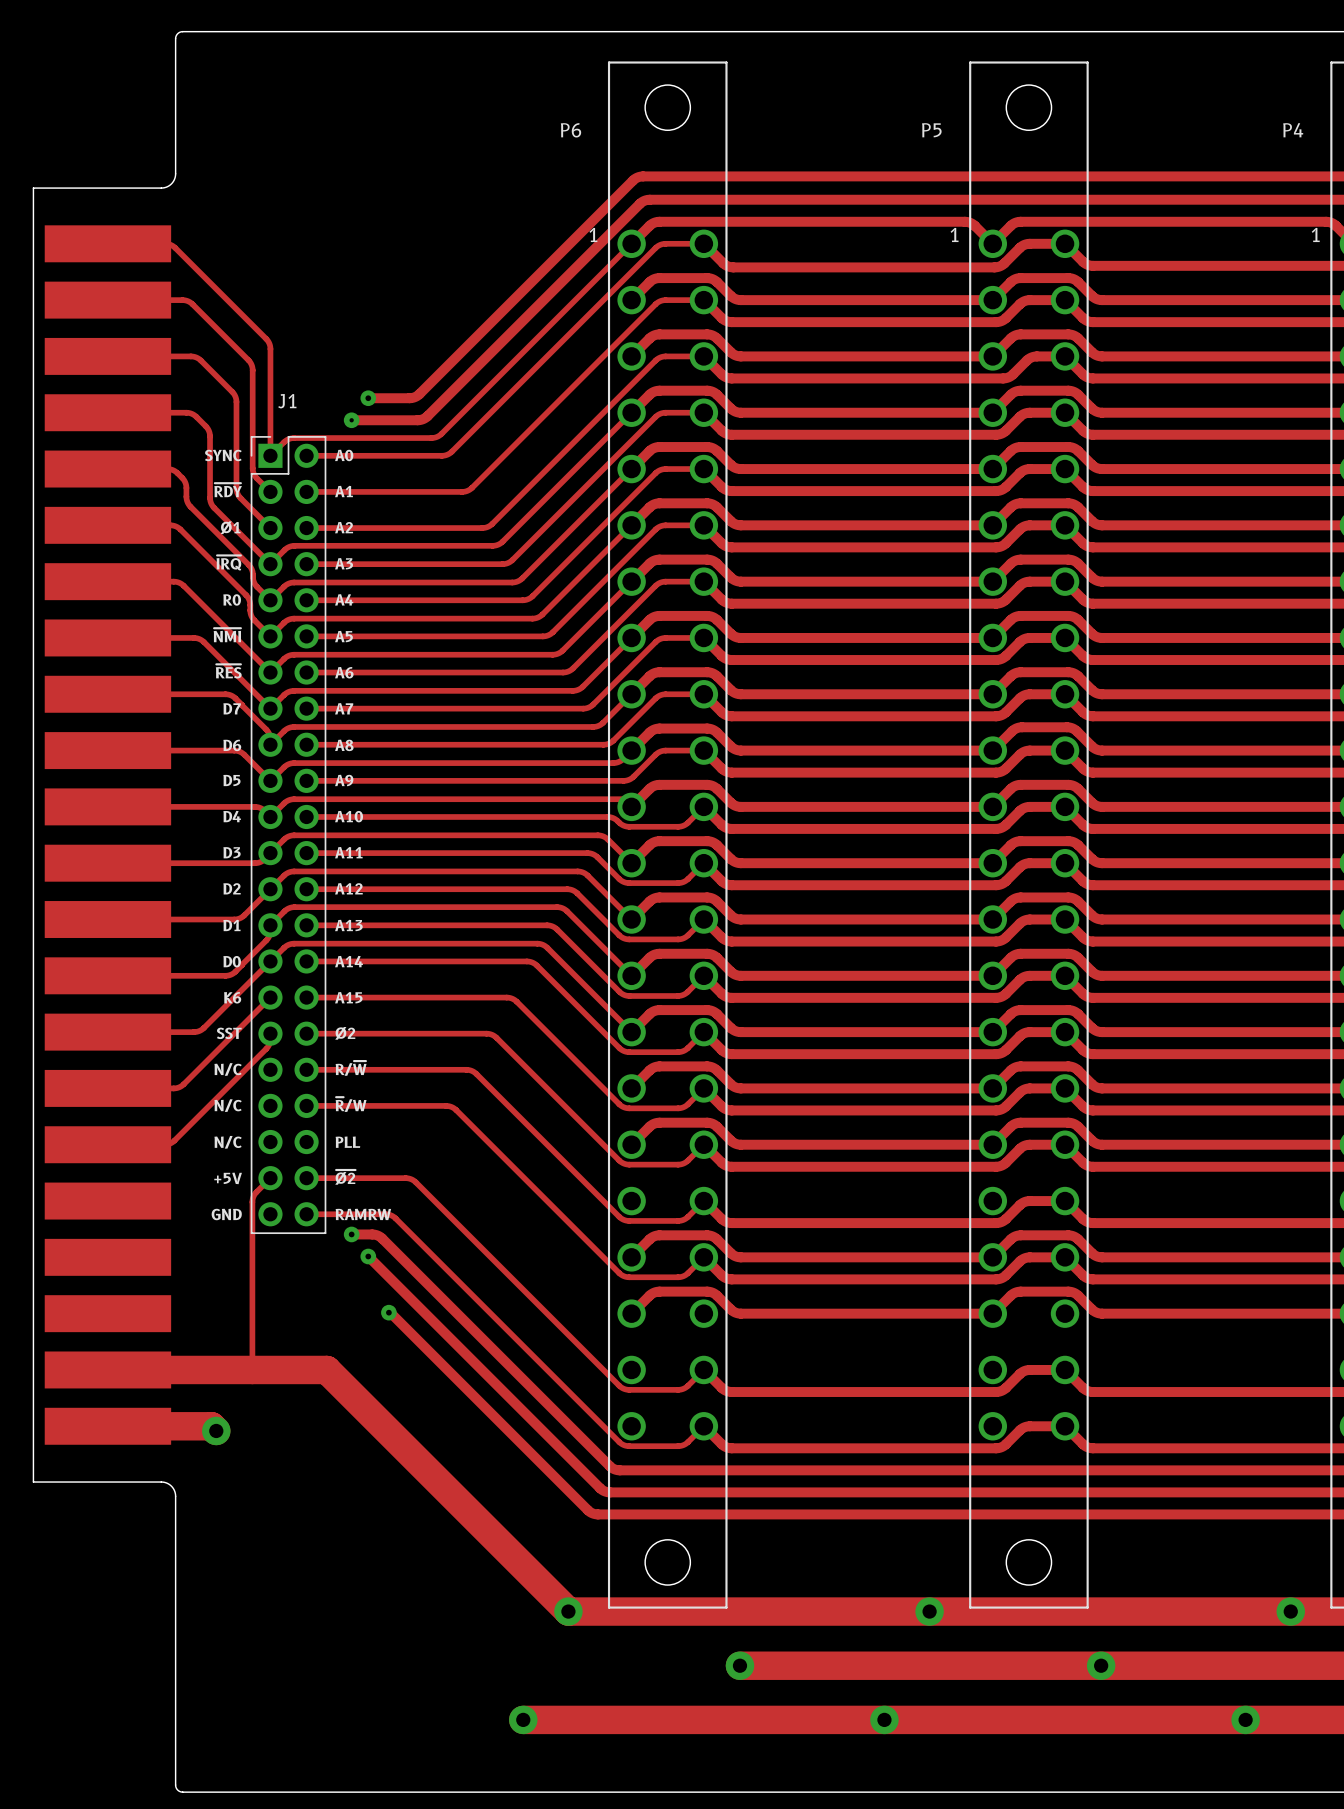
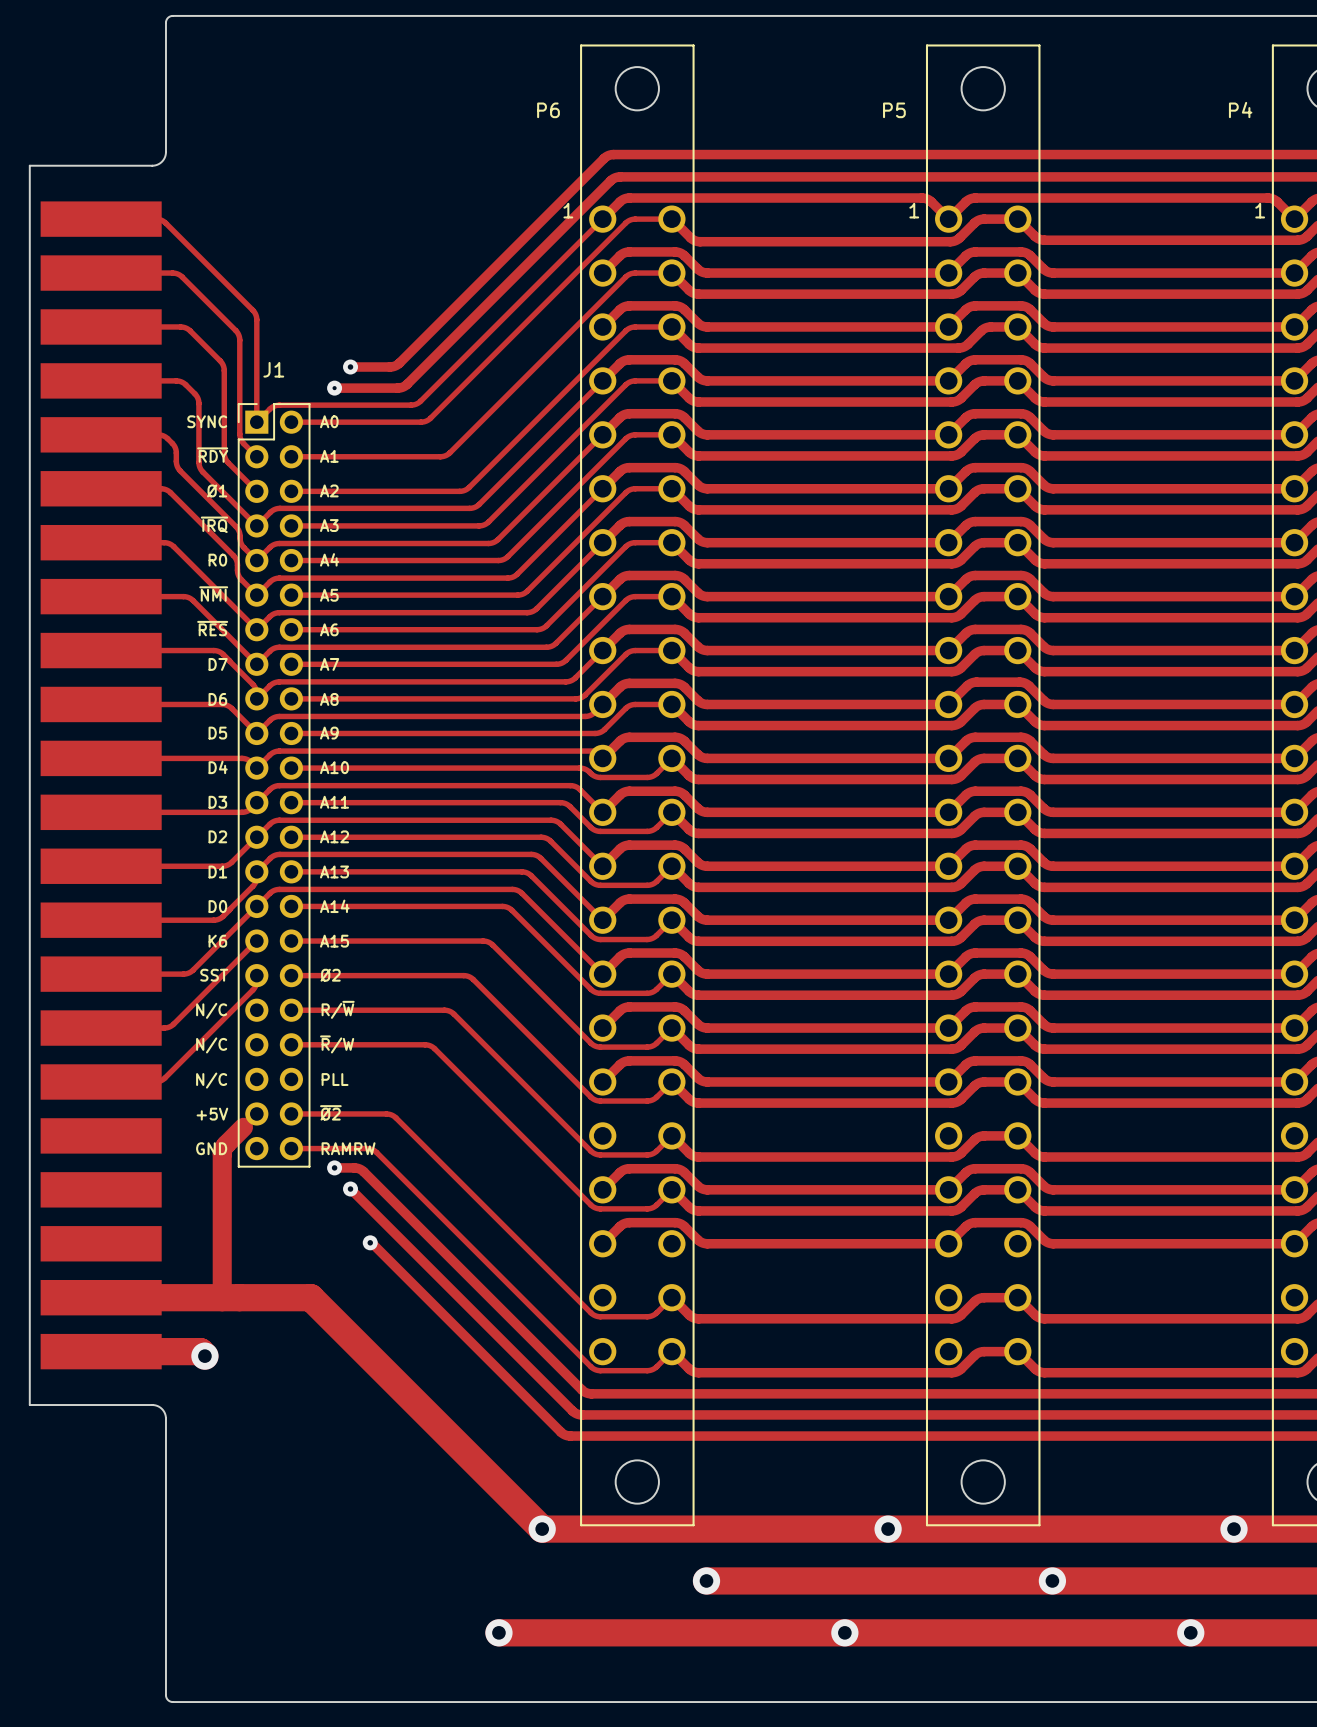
track: (256, 1192) (252, 1202) (252, 1369) -> (243, 1127) (225, 1145) (222, 1152) (222, 1297)

